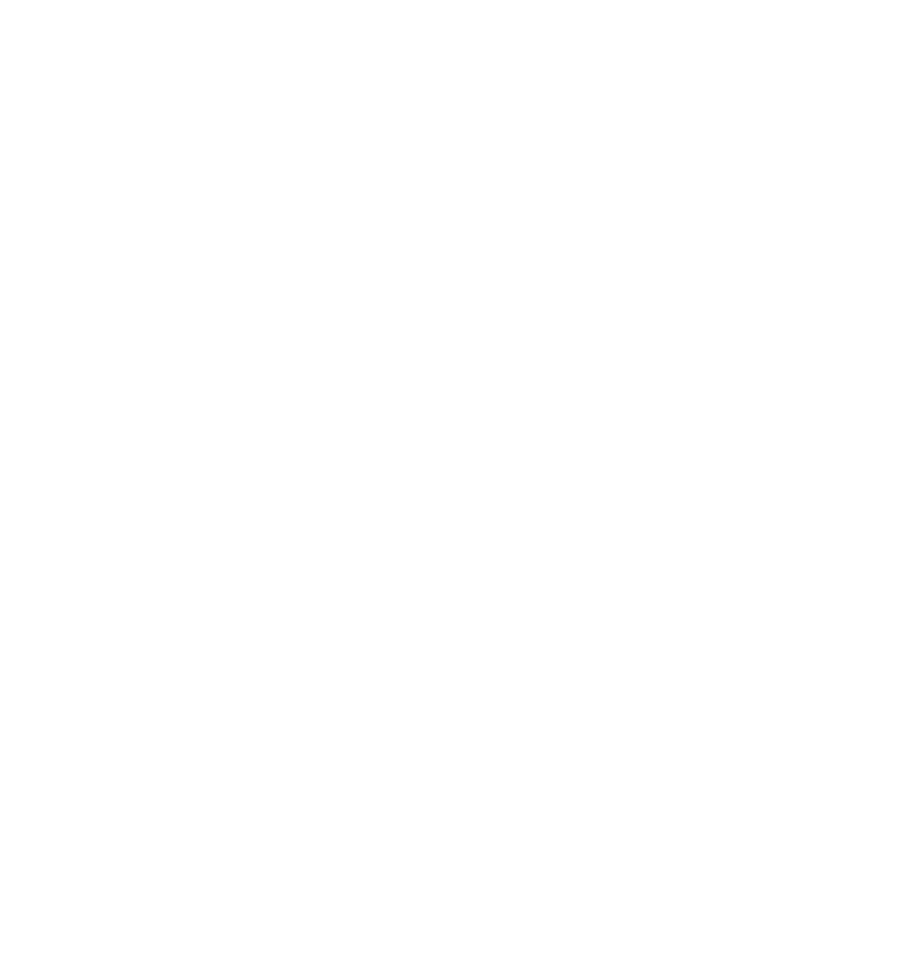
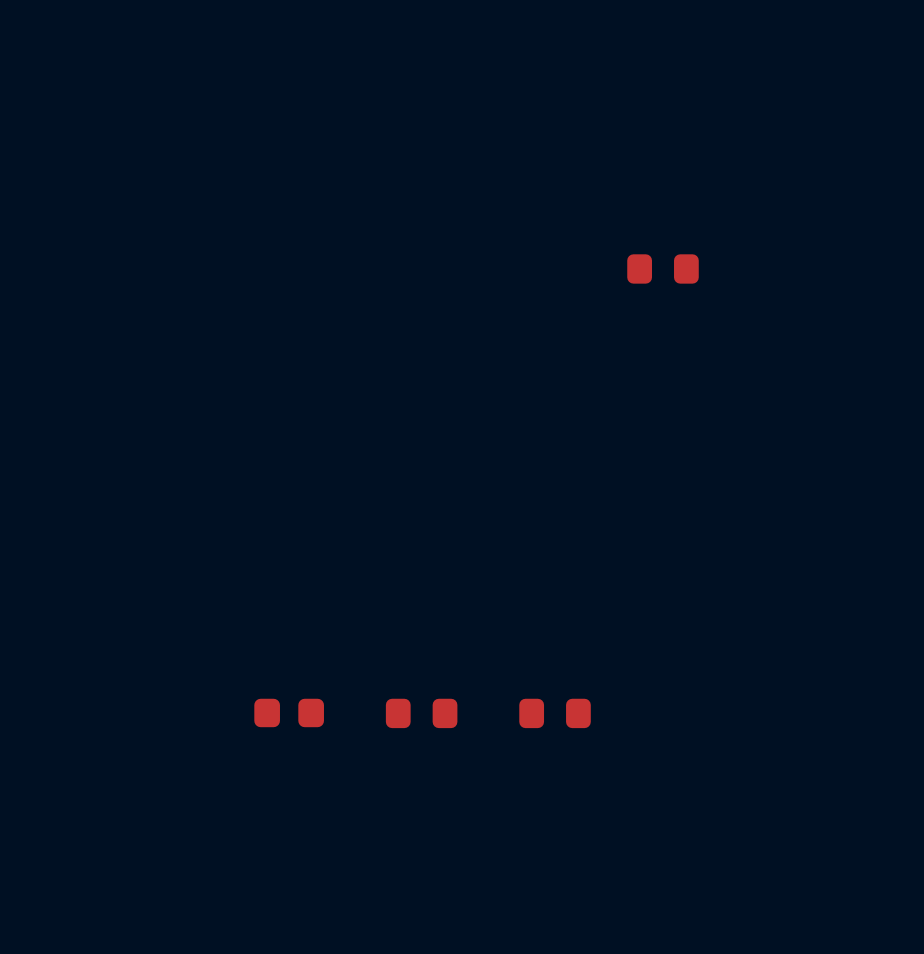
part: none -> (663, 268)
part: none -> (289, 712)
part: none -> (421, 713)
part: none -> (555, 713)

